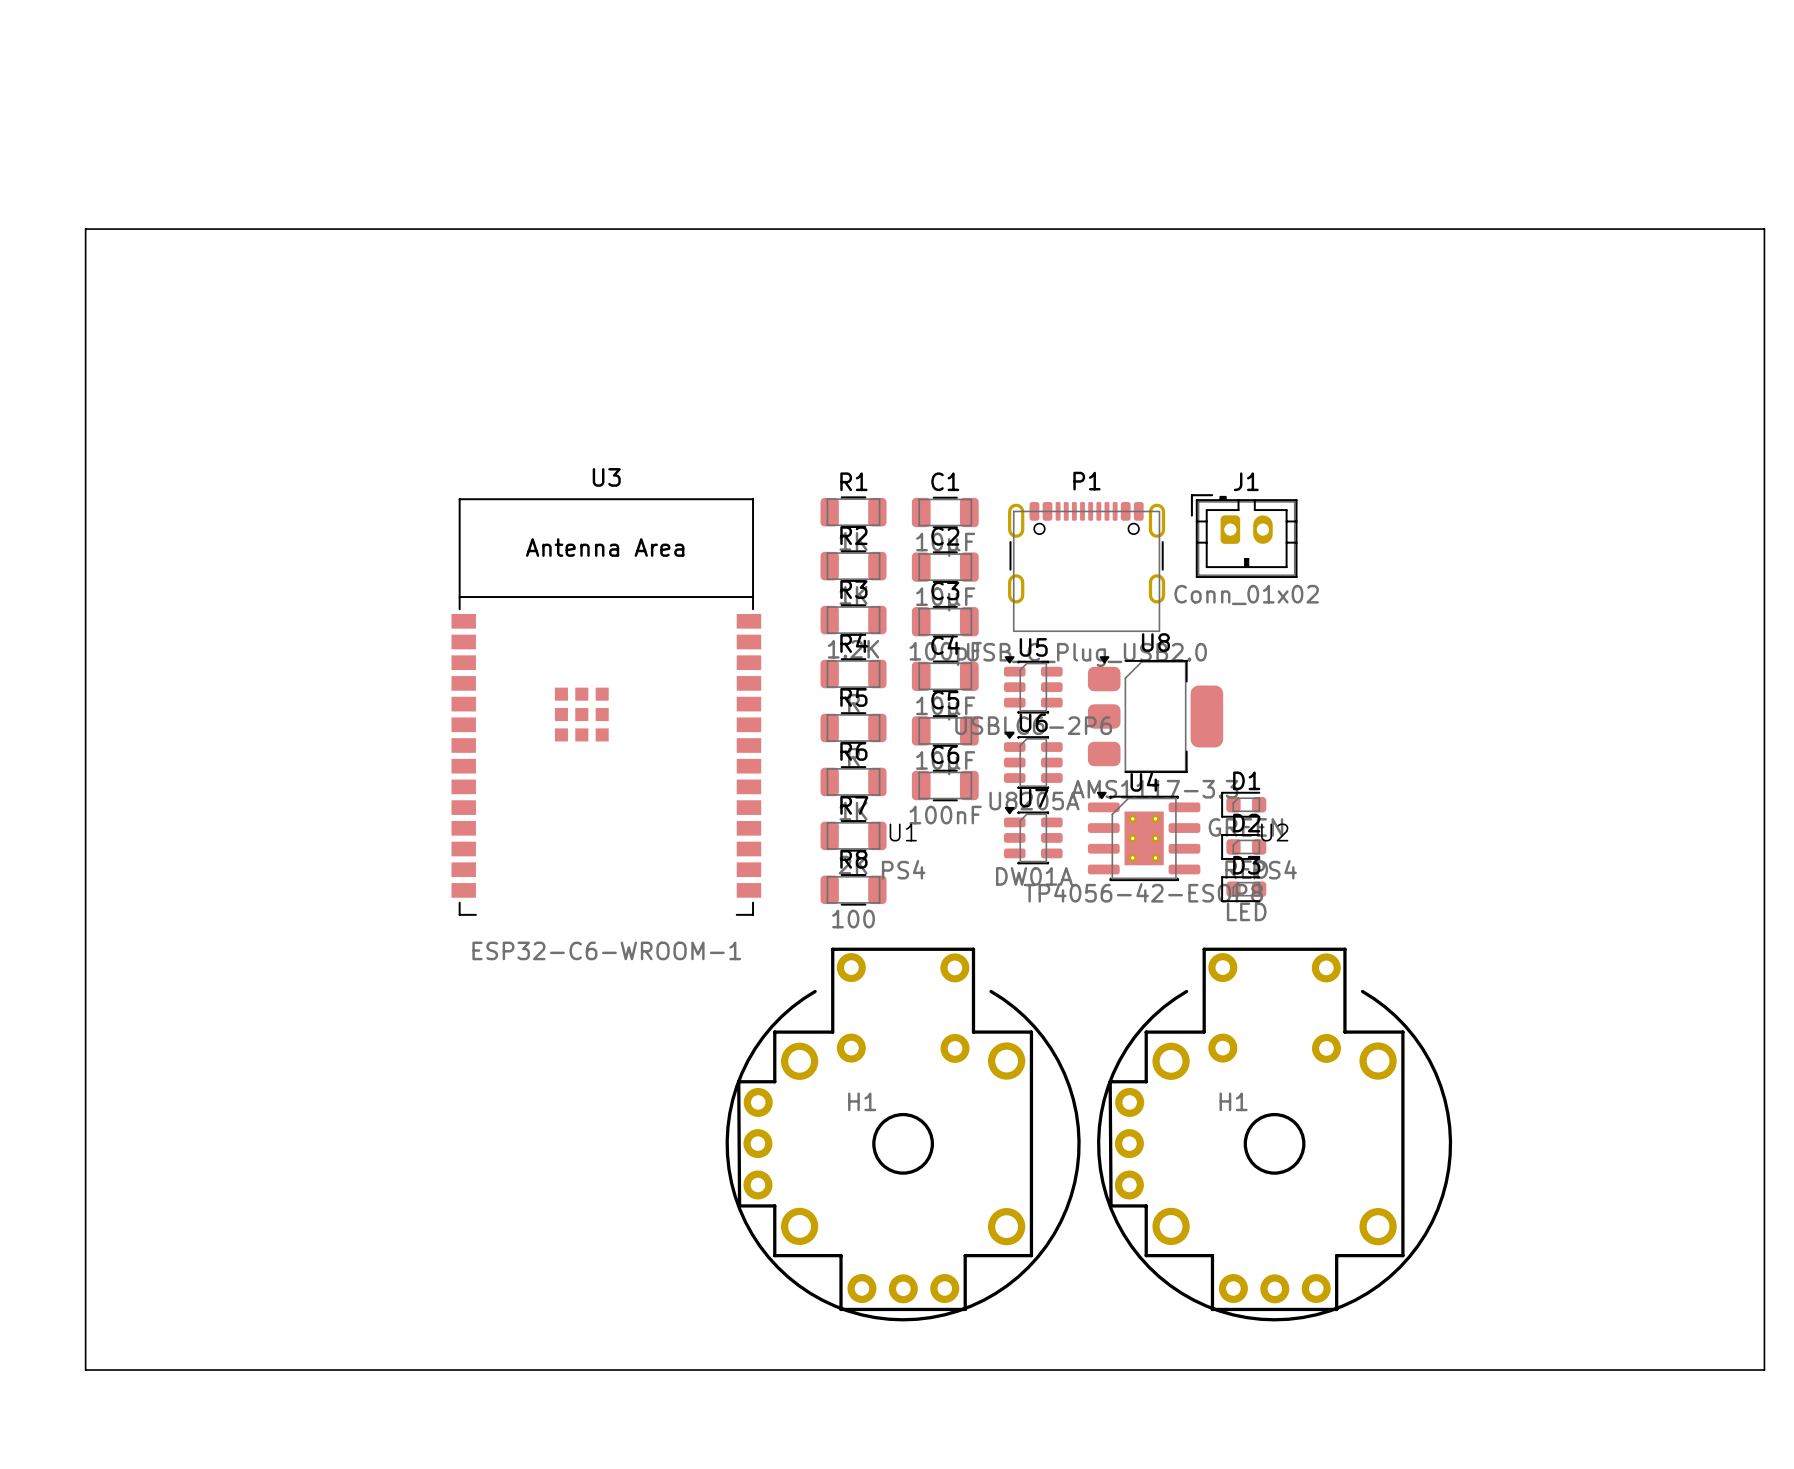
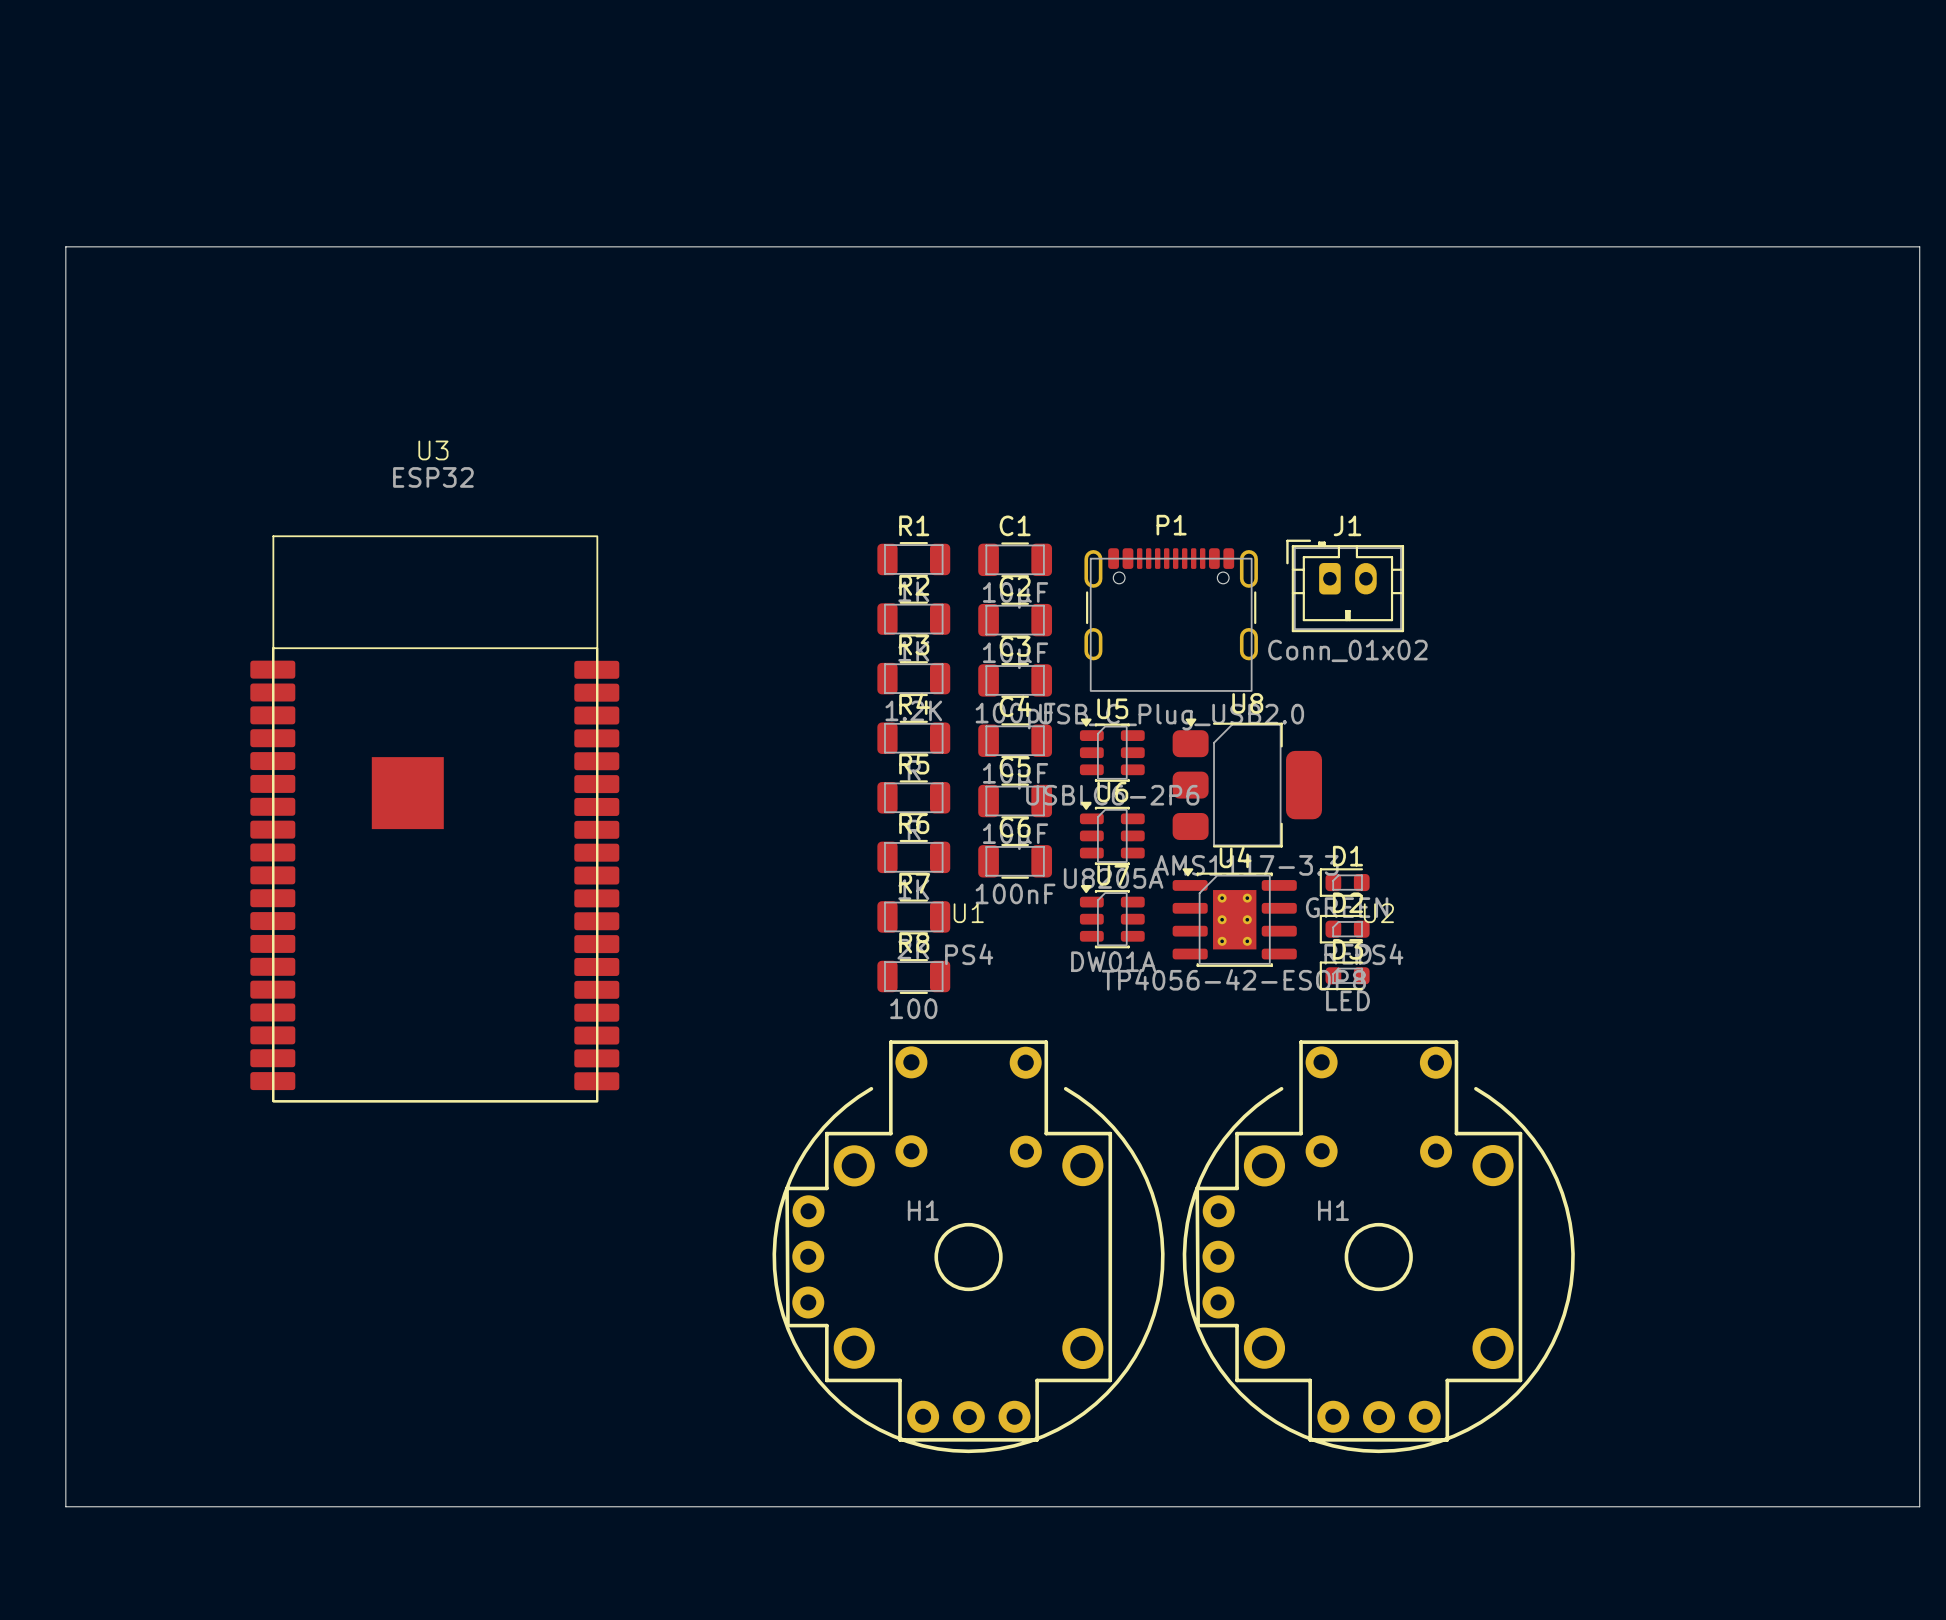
U3 name position: U3 (606, 477) -> U3 (433, 450)
U3 footprint: [451, 498, 762, 916] -> [250, 535, 620, 1103]
U3 value: ESP32-C6-WROOM-1 (606, 950) -> ESP32 (433, 477)

